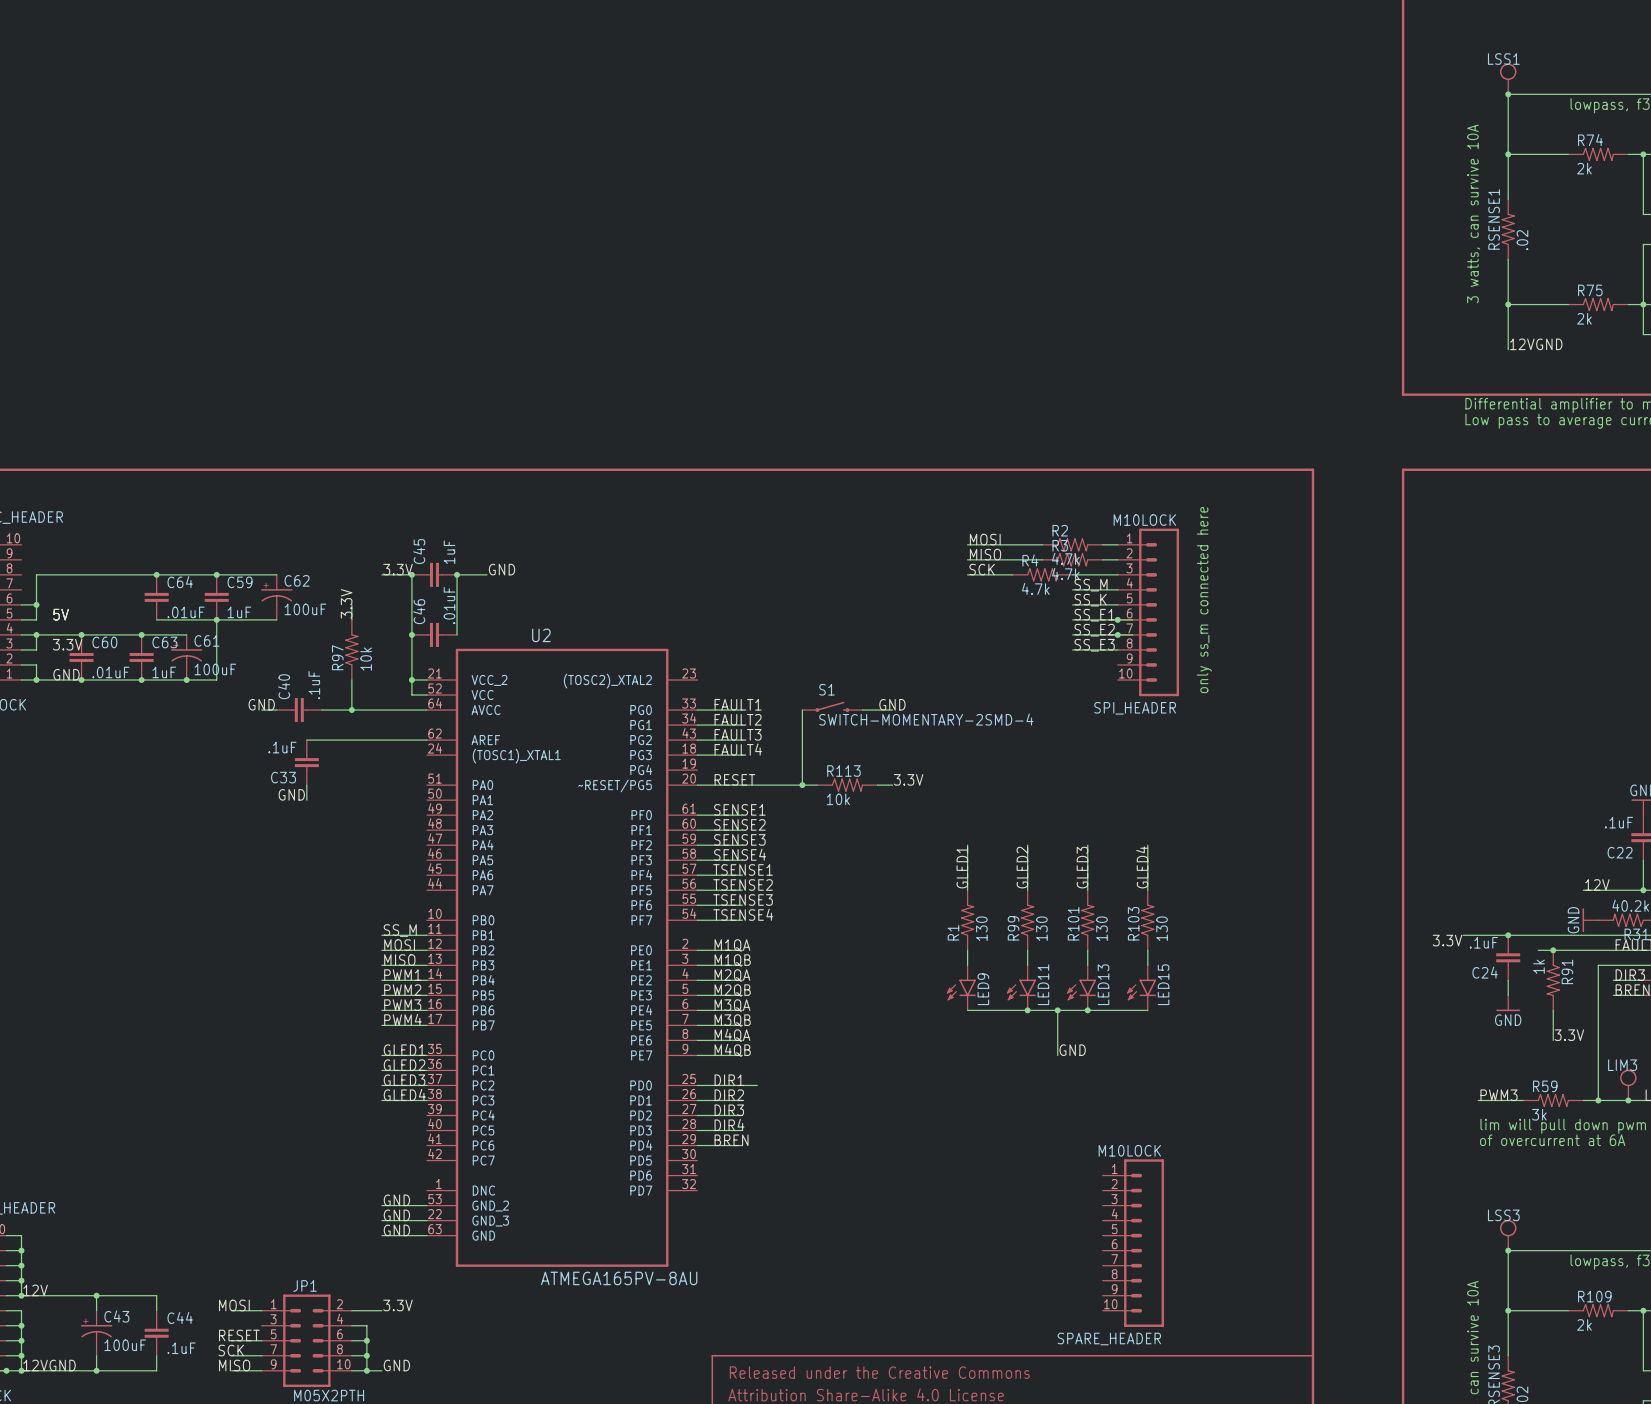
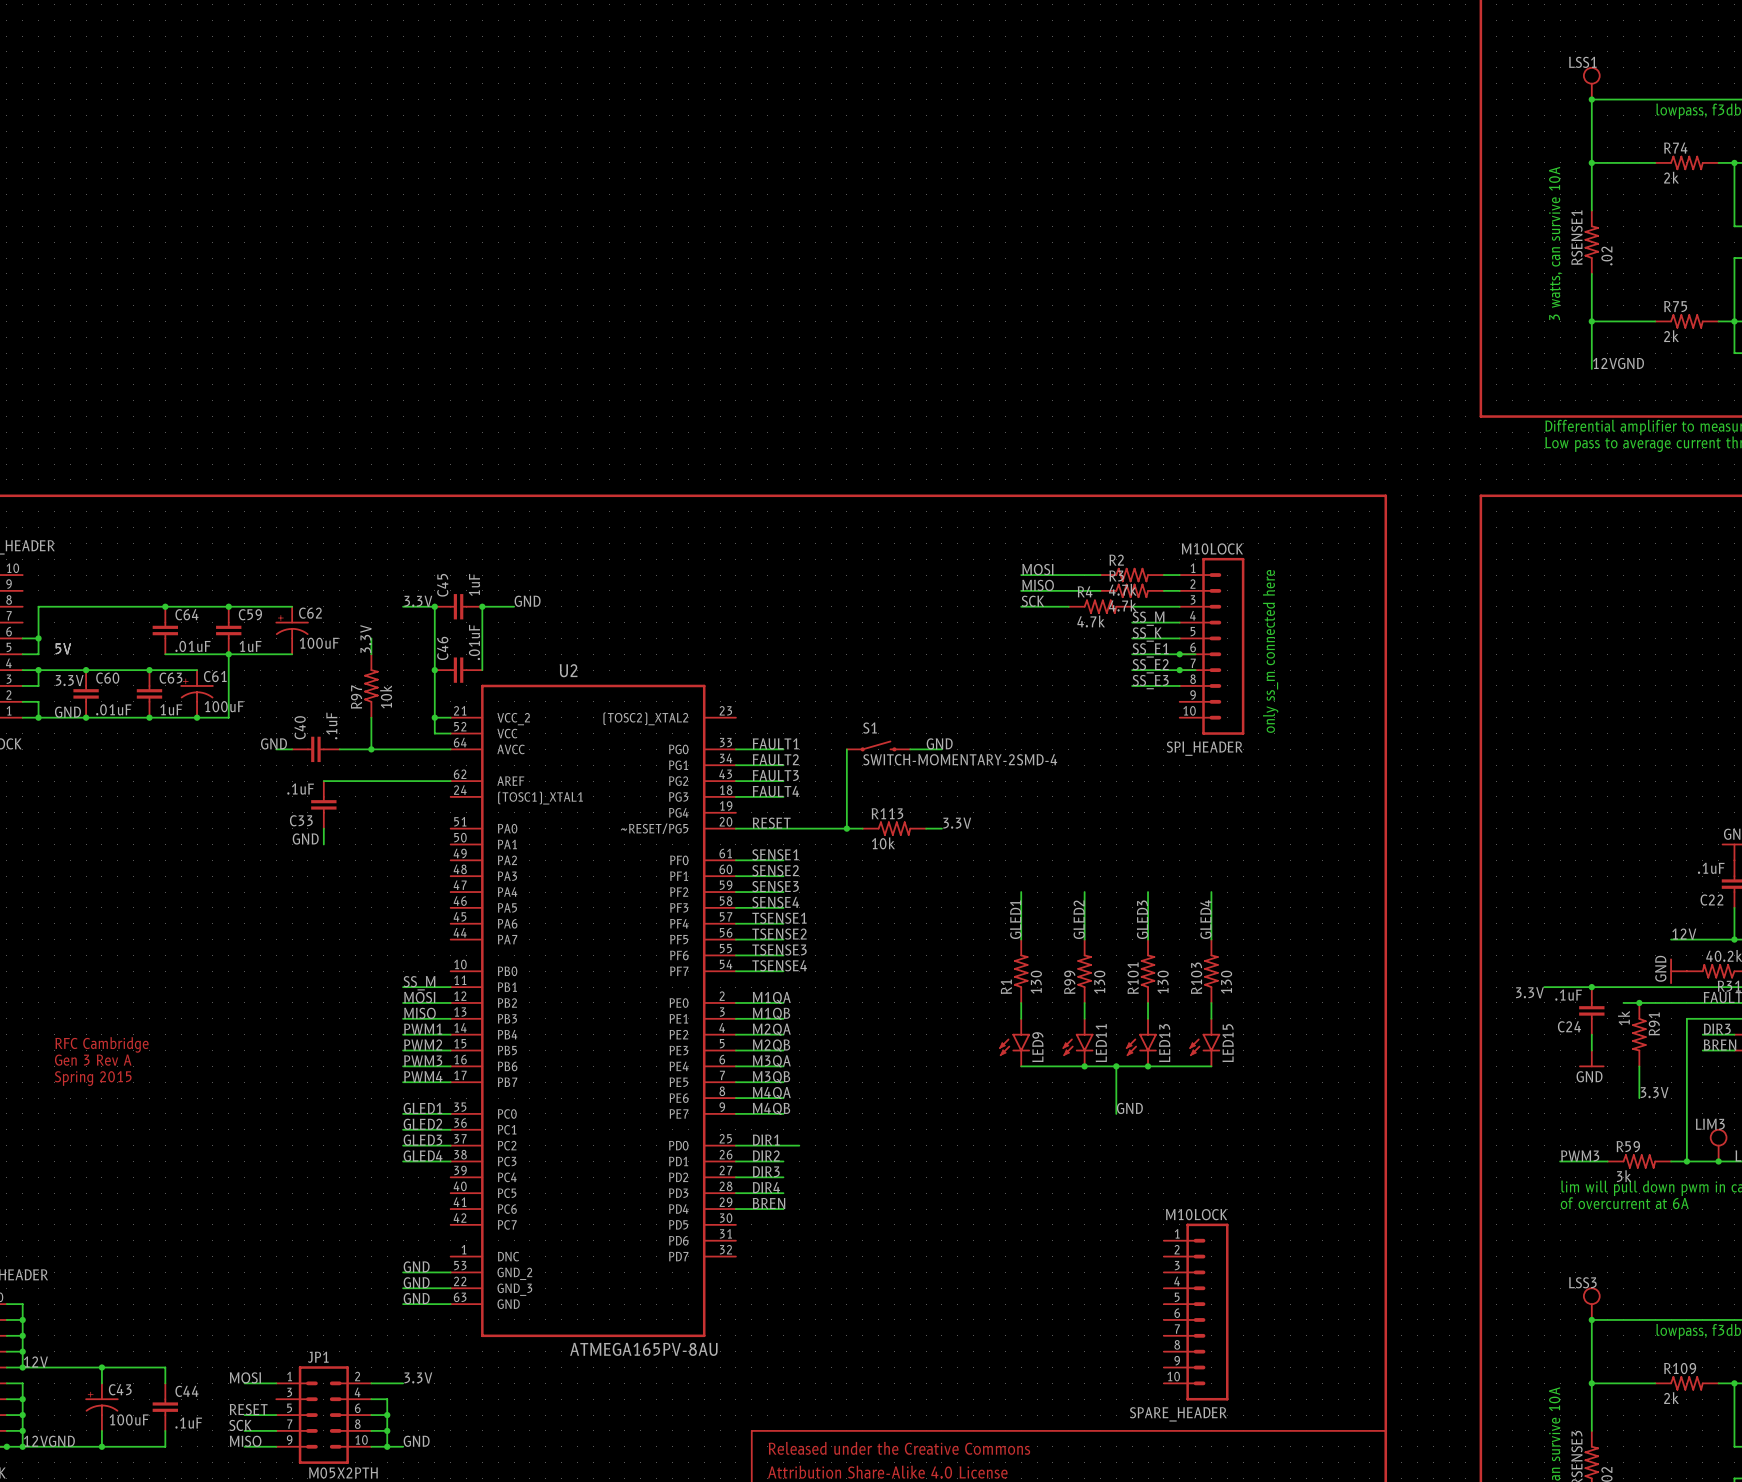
part: none -> (101, 1061)

